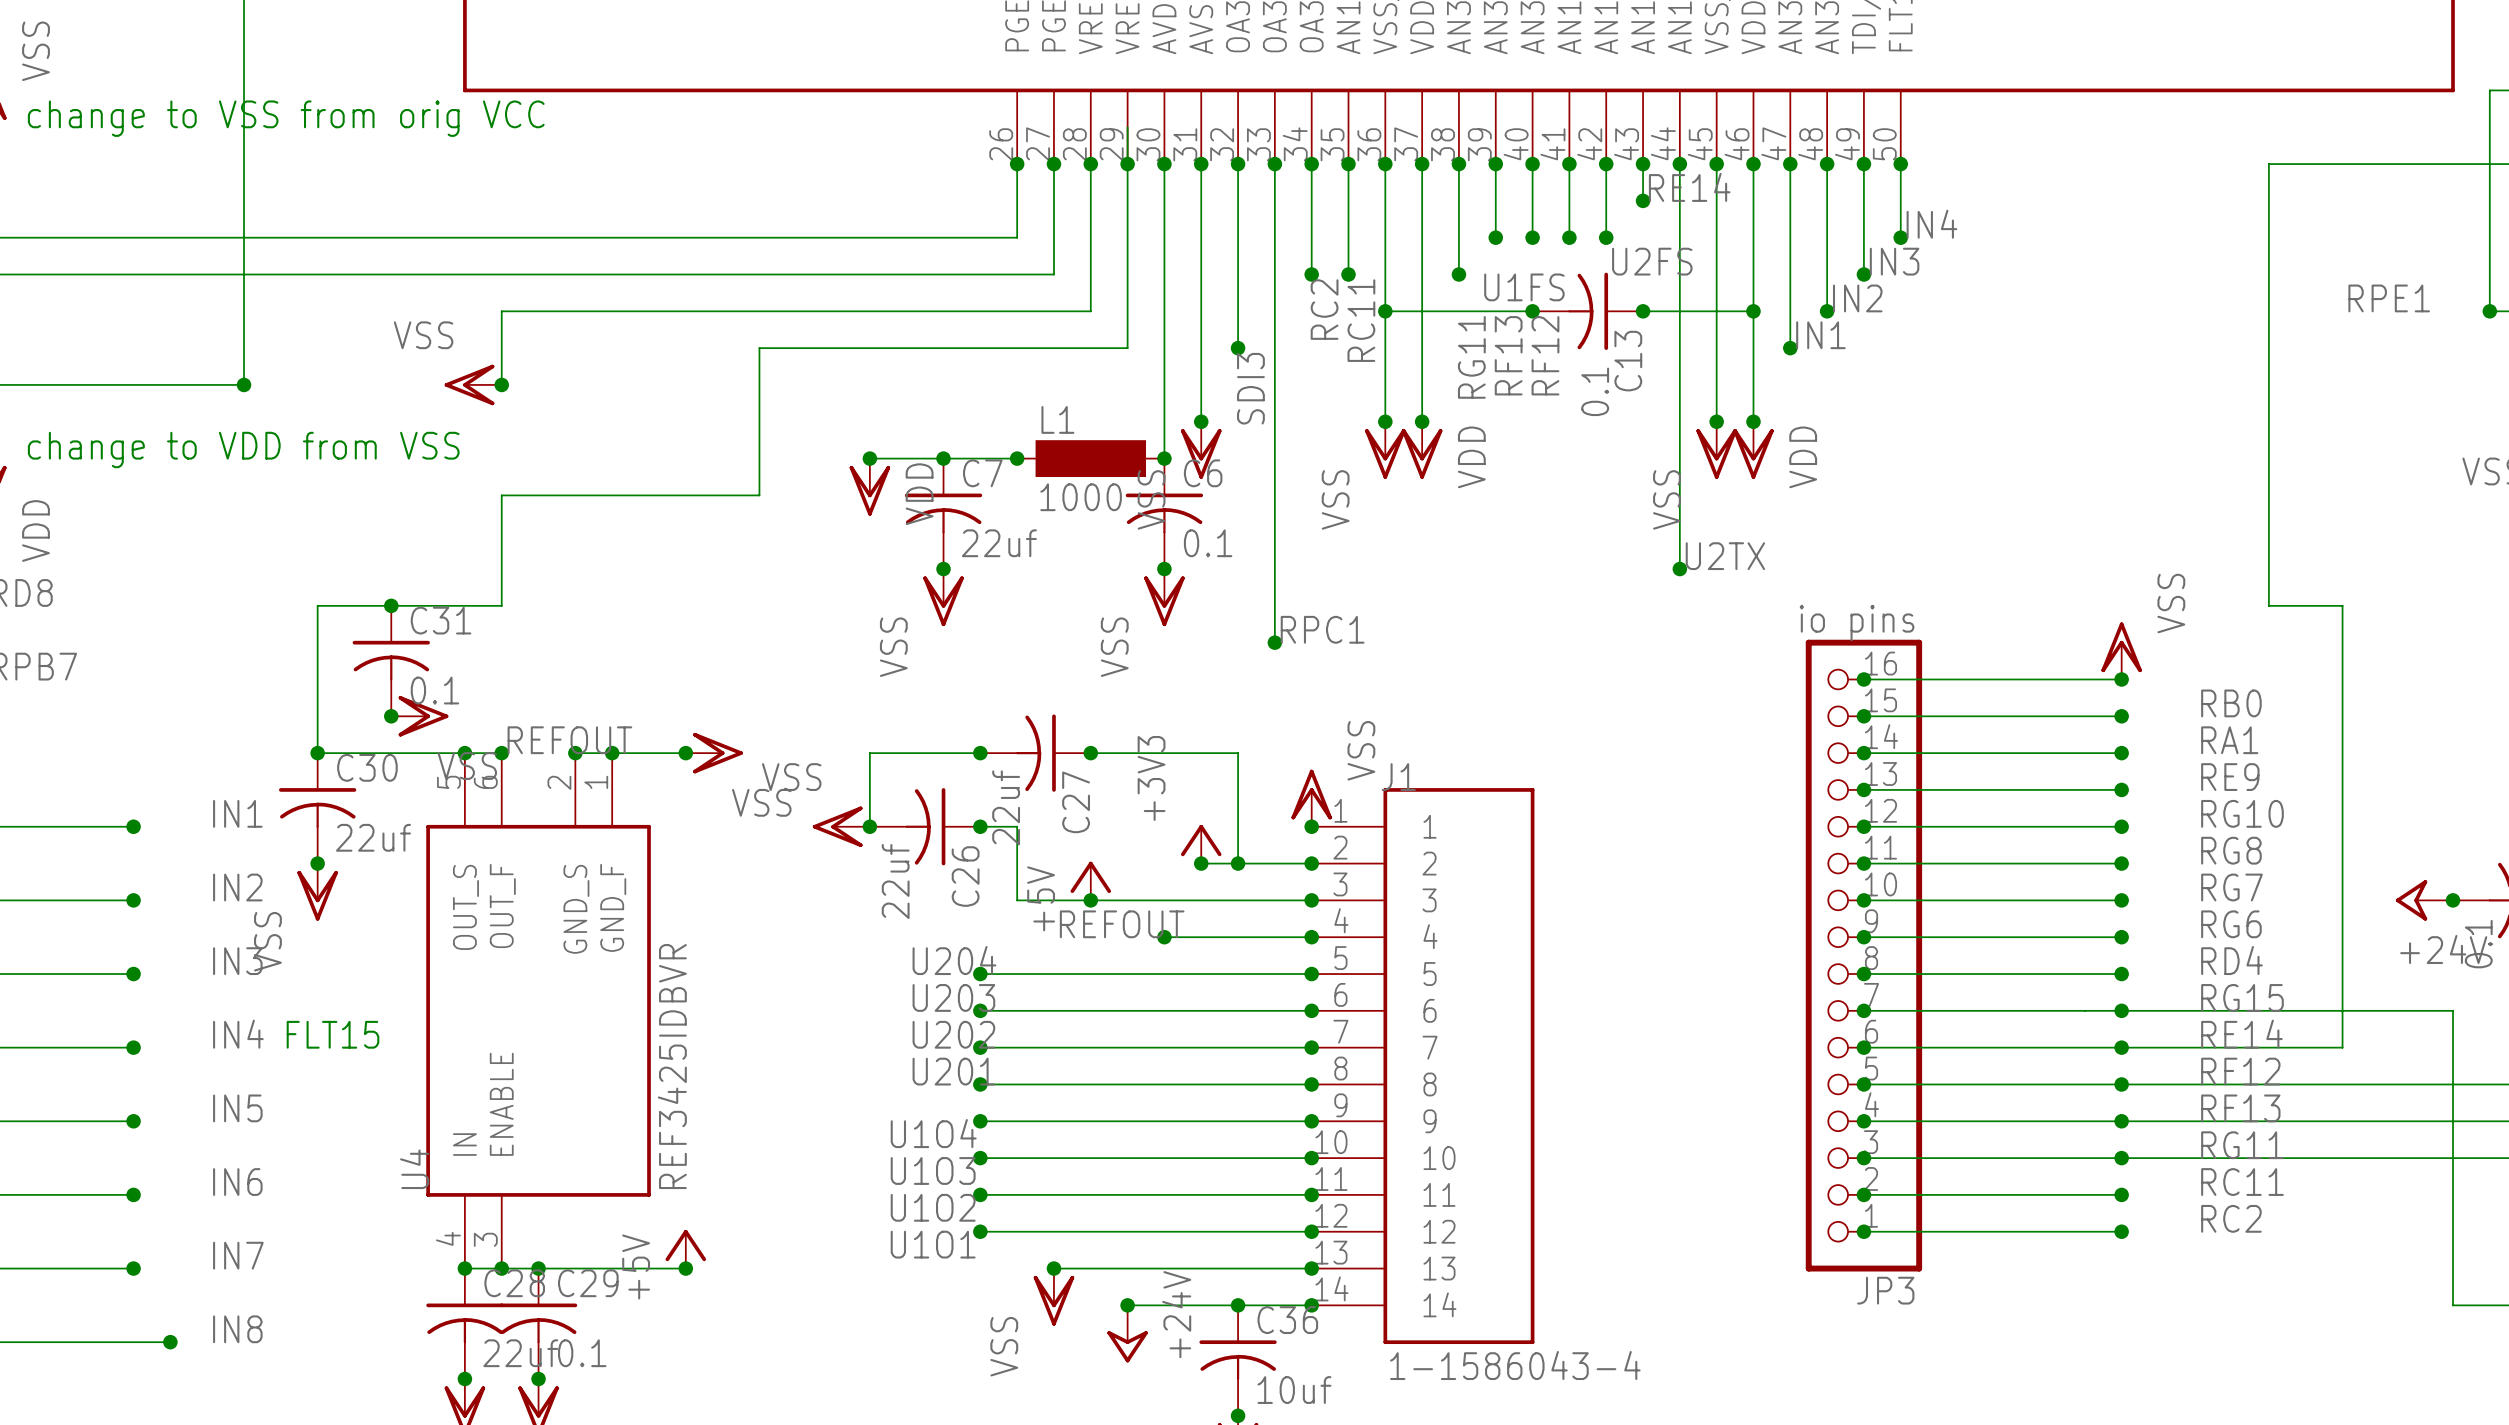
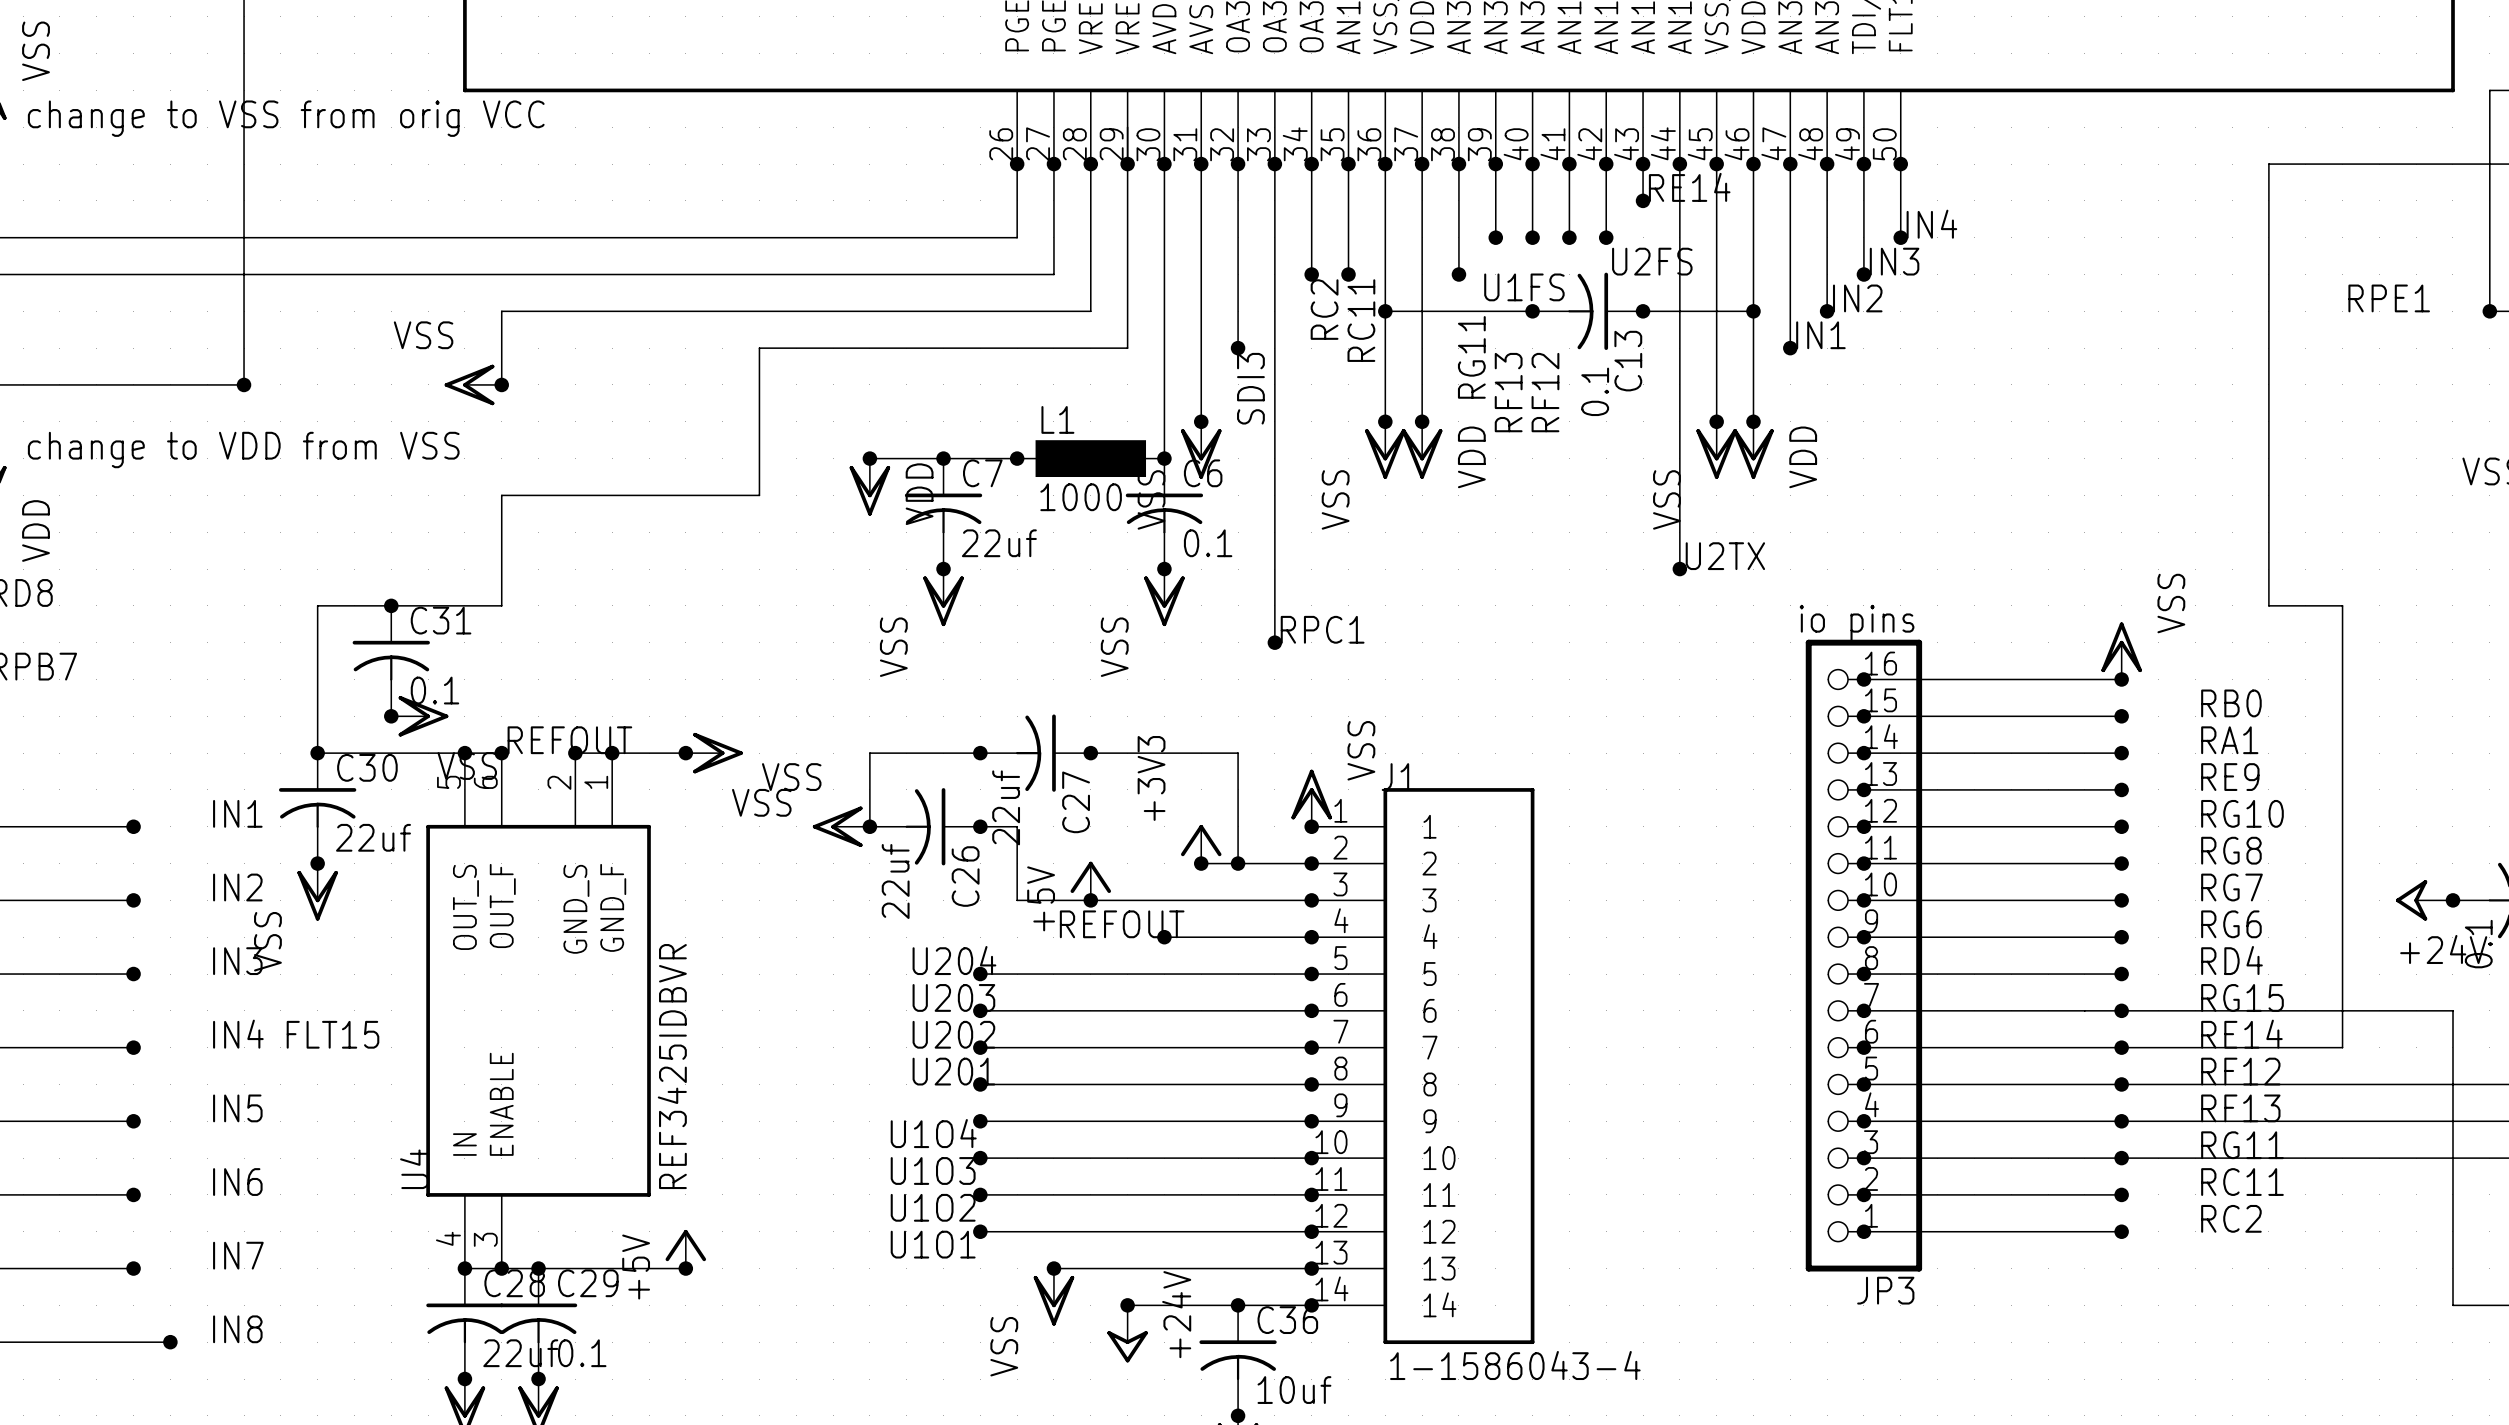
label position: RF13 (1508, 355) -> RF13 (1508, 392)
label position: RF12 (1545, 355) -> RF12 (1545, 392)

